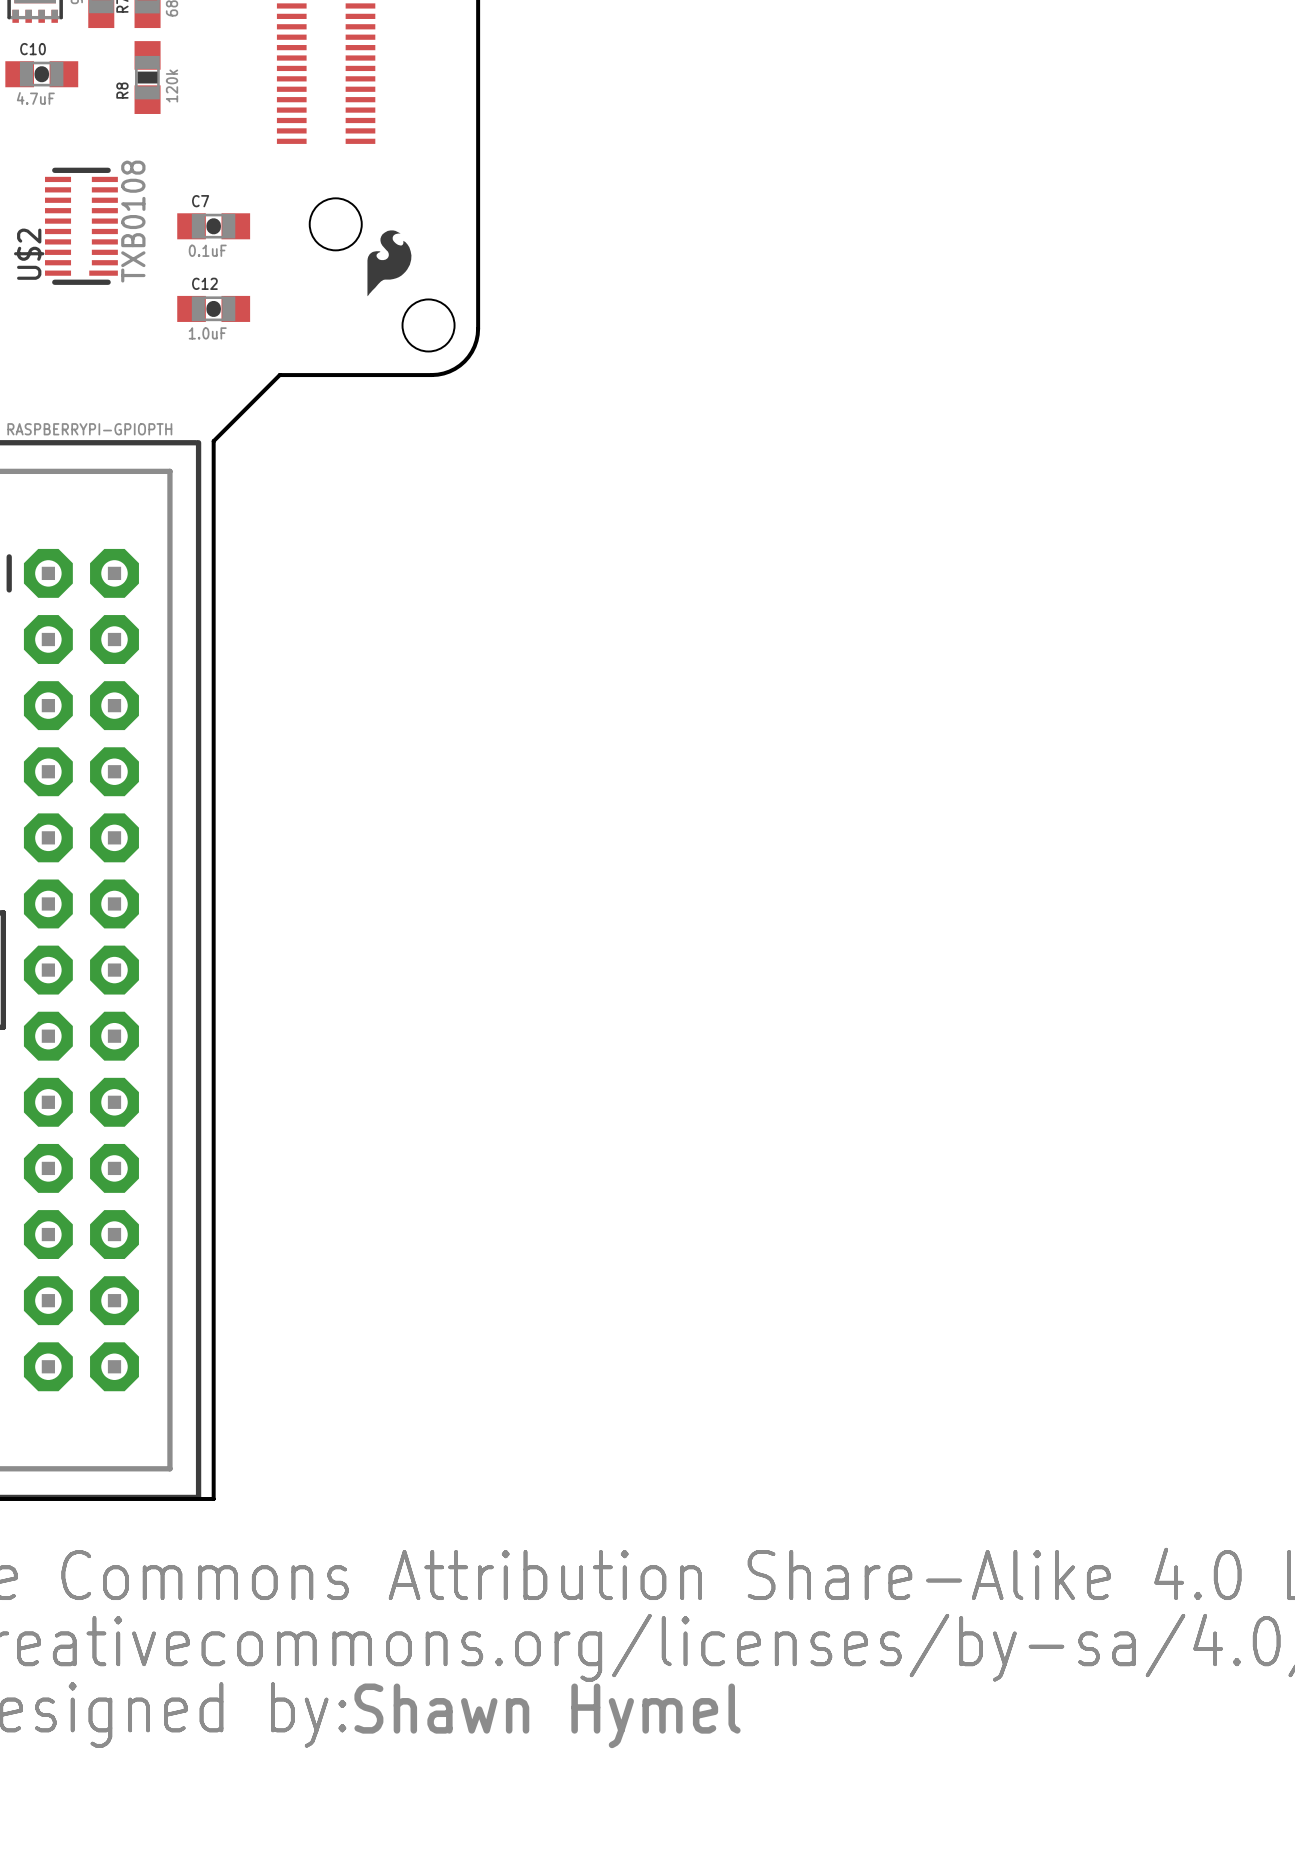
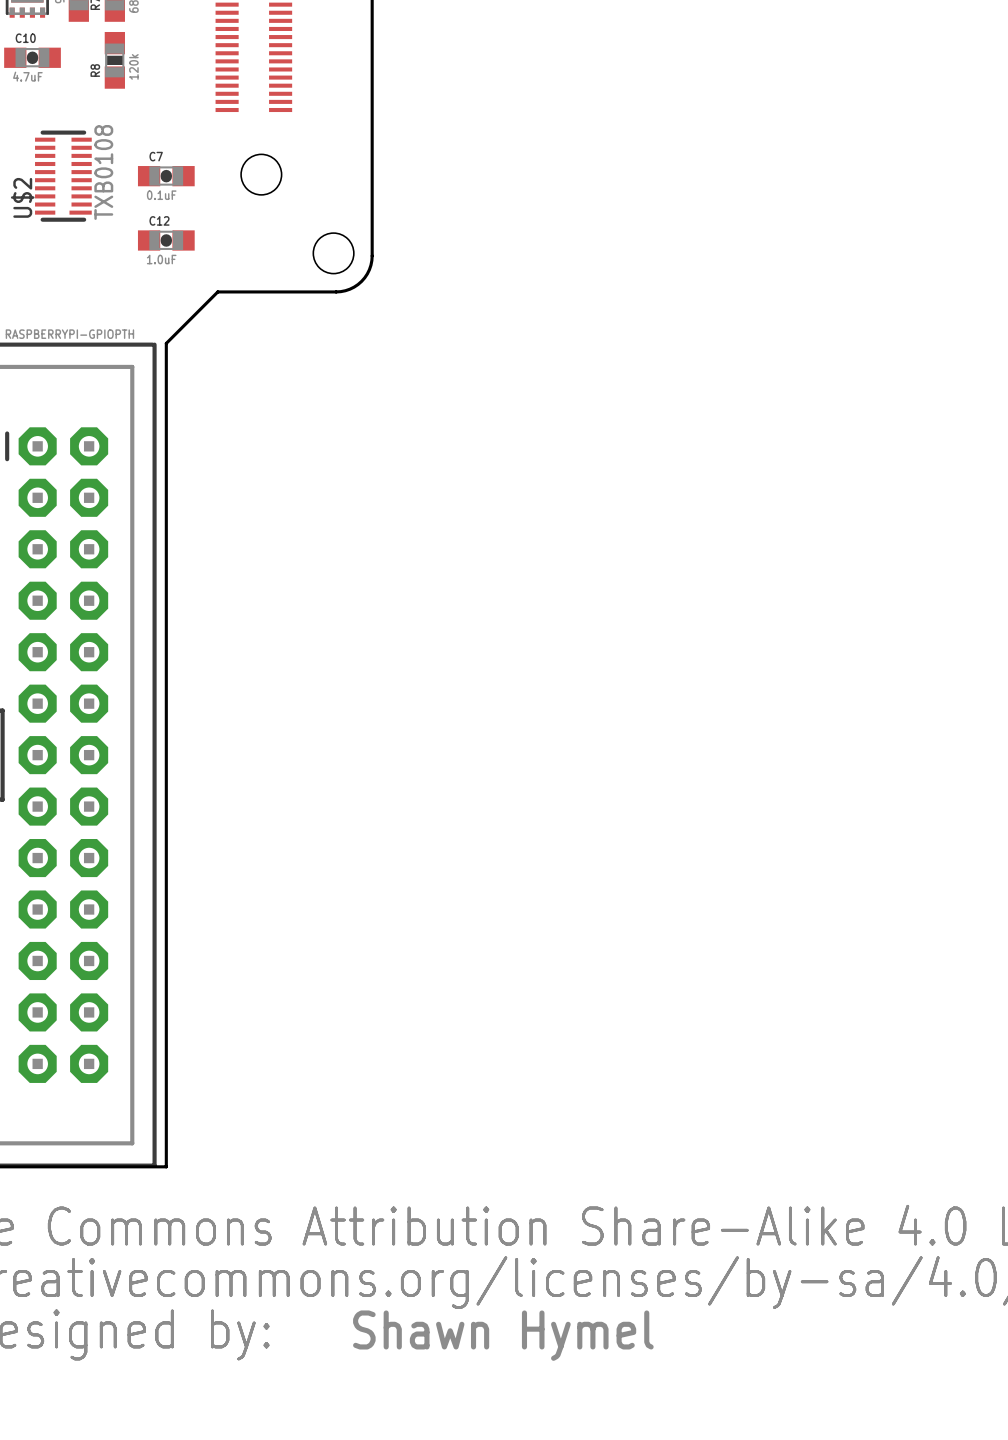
drawing: [367, 230, 412, 297] -> none
text position: Shawn Hymel (547, 1715) -> Shawn Hymel (503, 1335)

